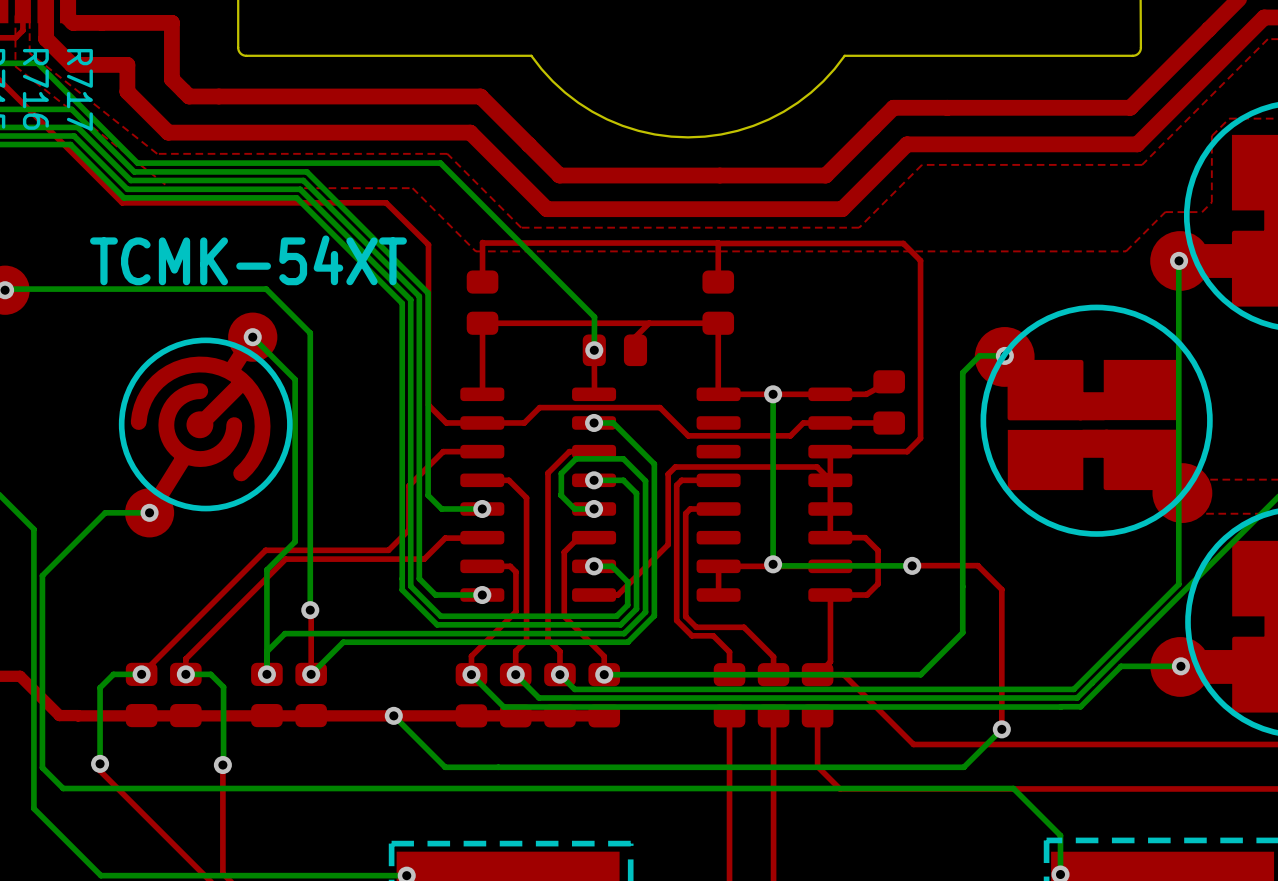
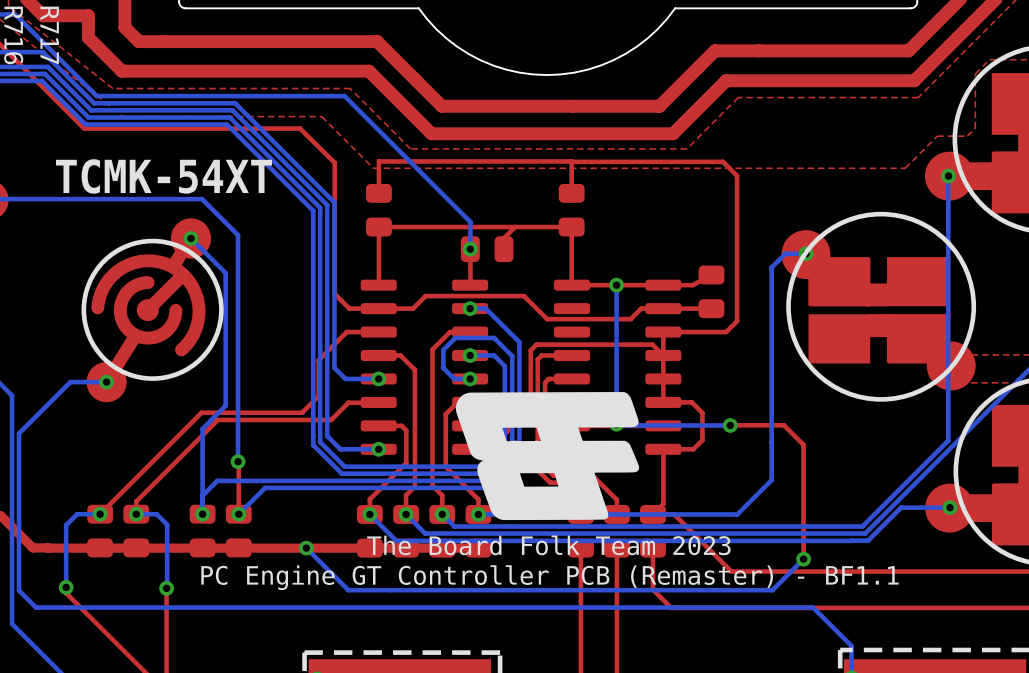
part: none -> (547, 456)
text: none -> The Board Folk Team 2023 (548, 545)
text: none -> PC Engine GT Controller PCB (Remaster) - BF1.1 (549, 577)

